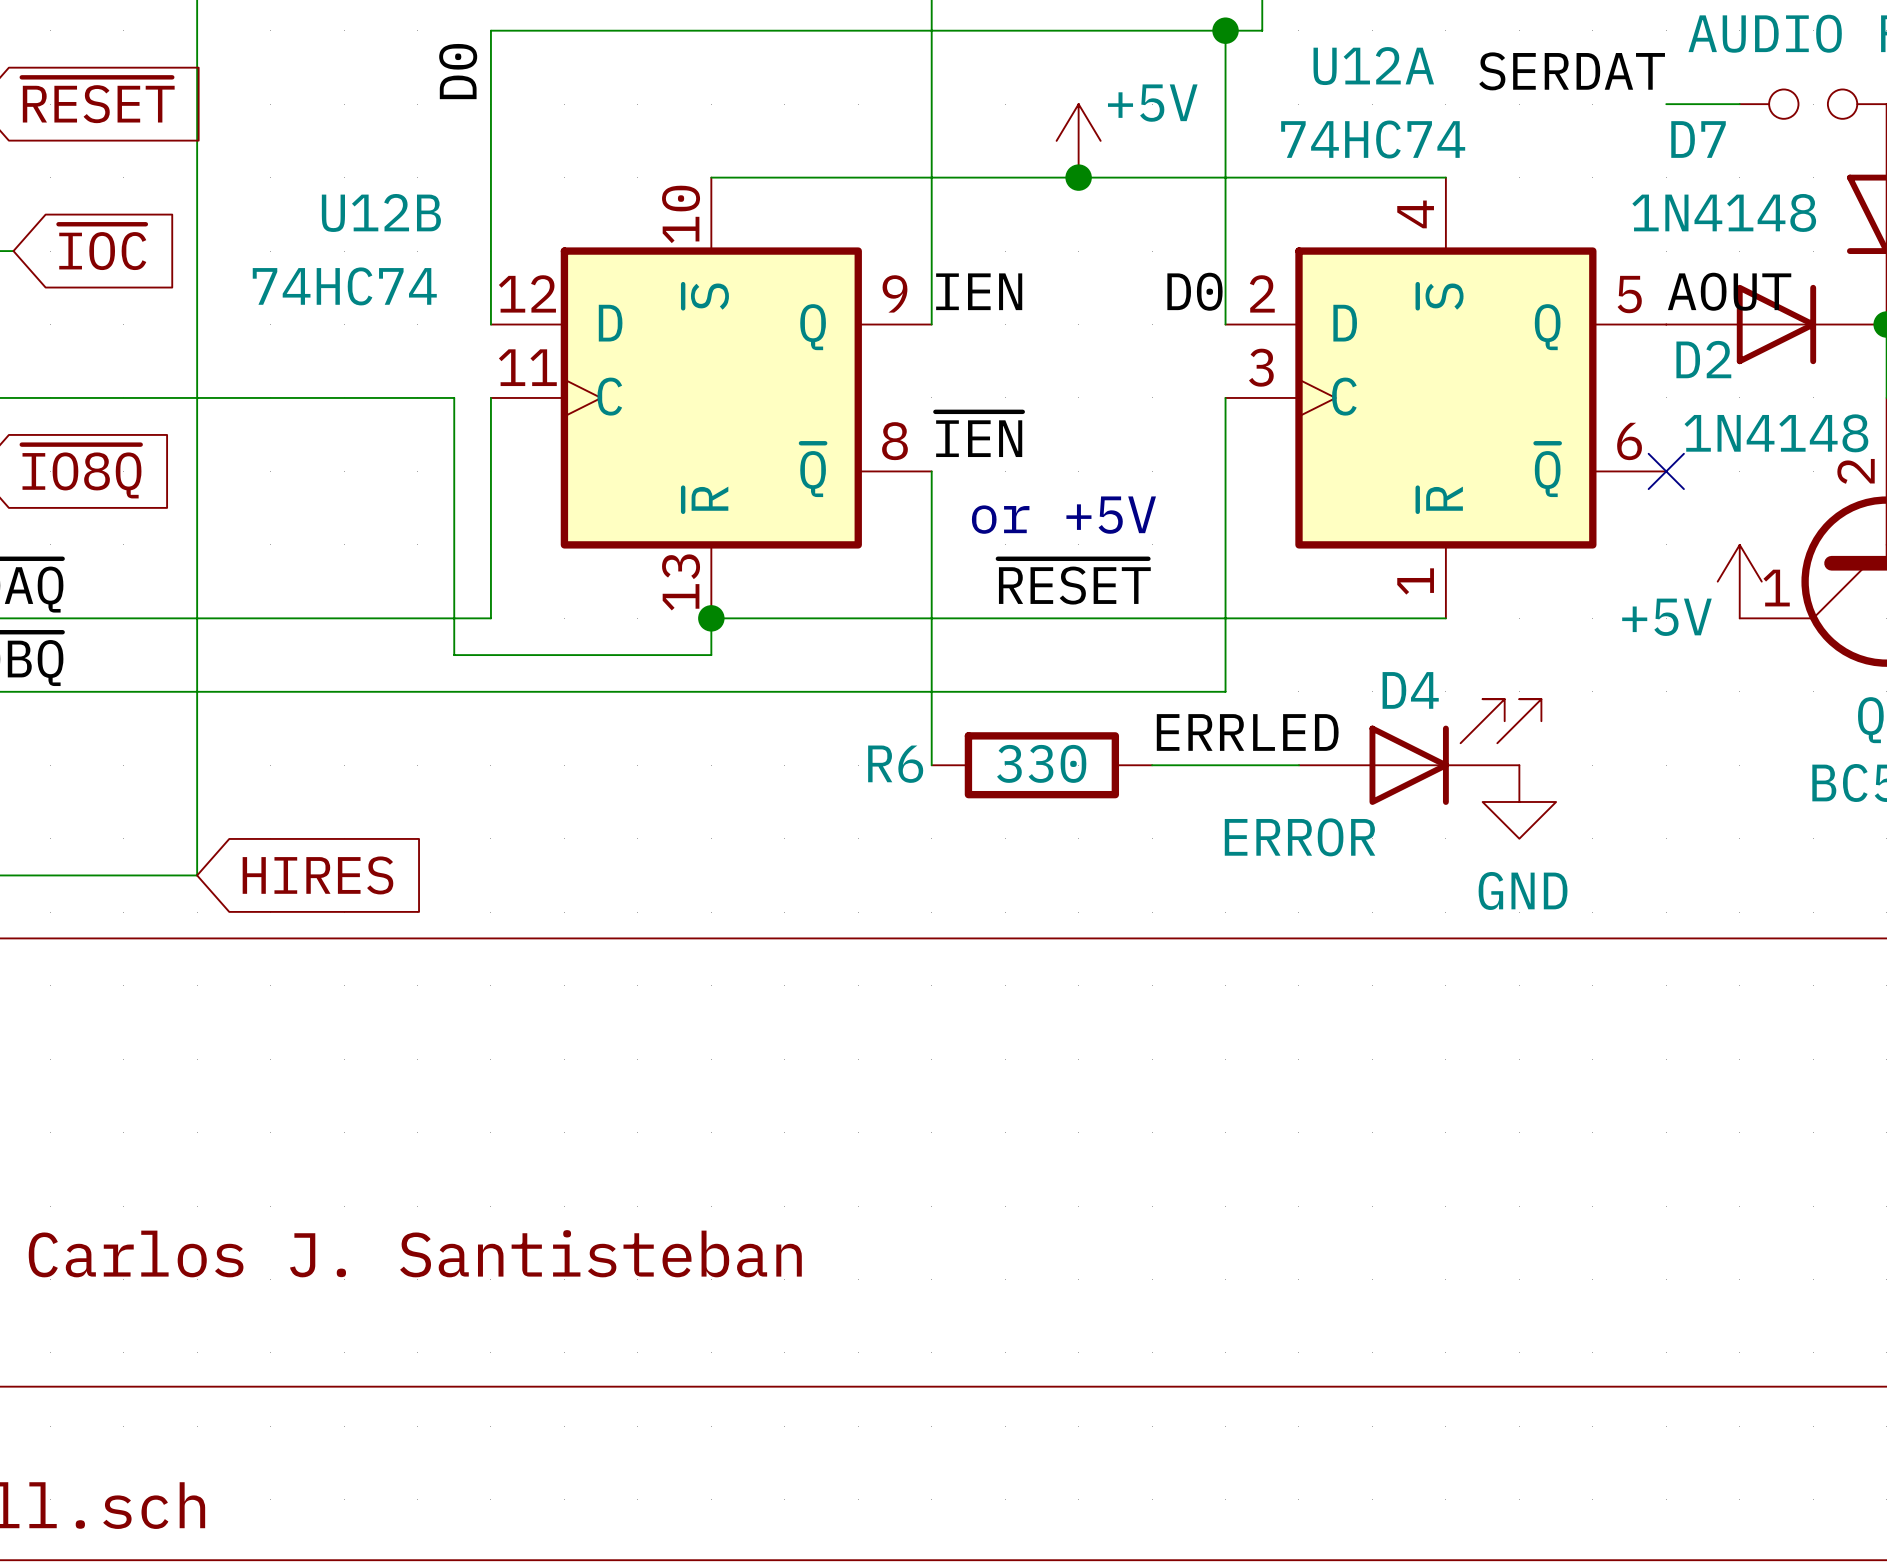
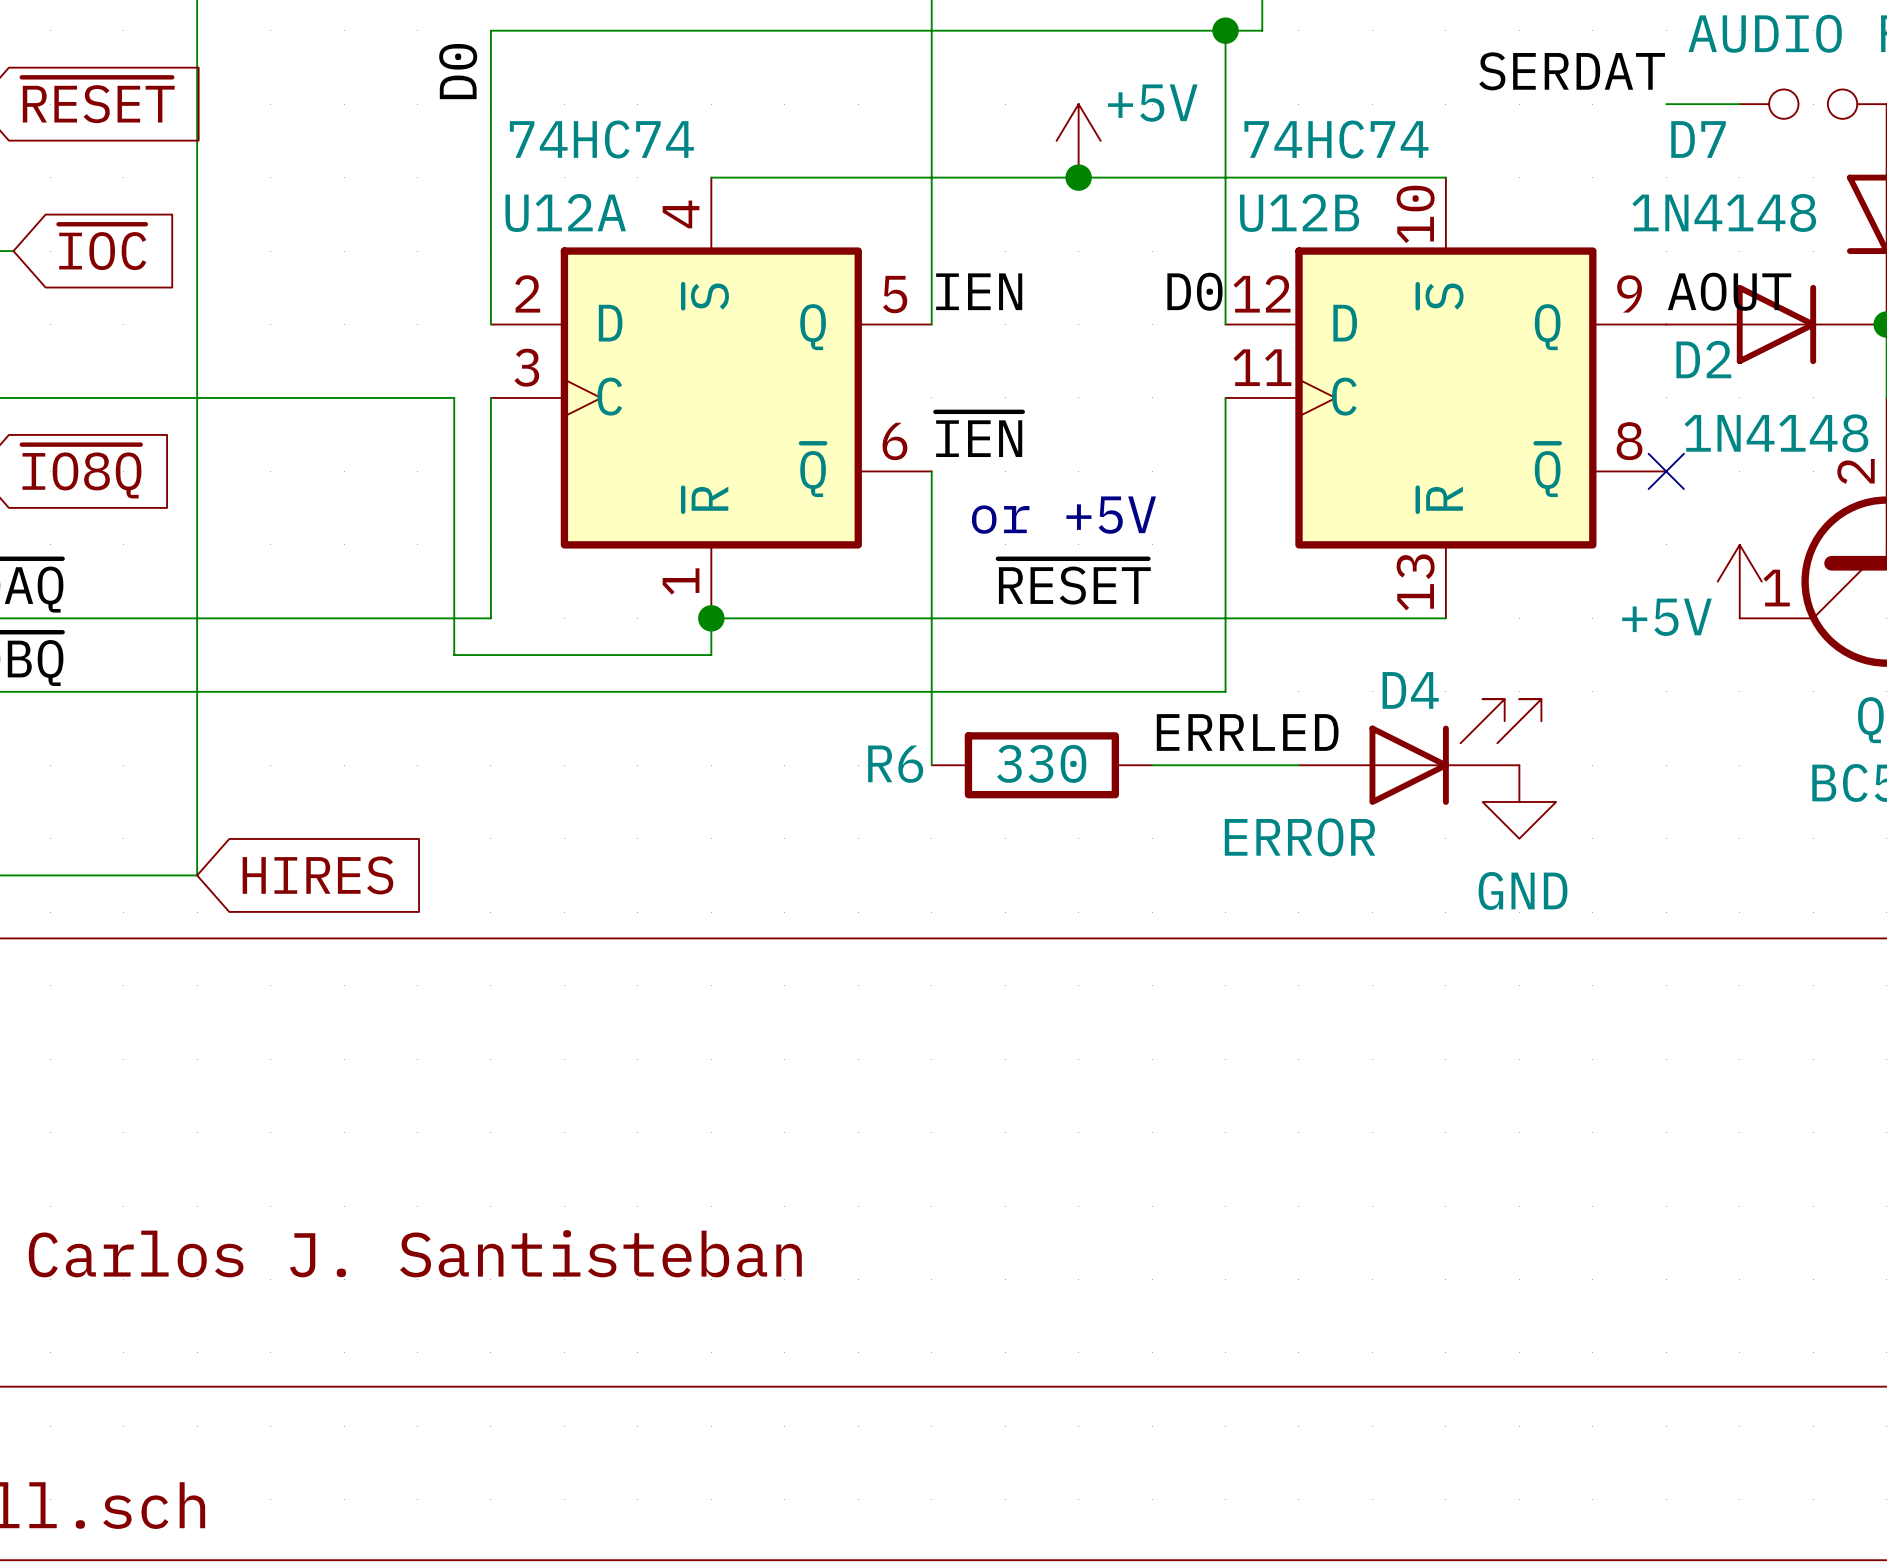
U12A name position: U12A (1373, 66) -> U12A (565, 212)
U12A value position: 74HC74 (1373, 139) -> 74HC74 (601, 139)
U12B name position: U12B (381, 212) -> U12B (1299, 212)
U12B value position: 74HC74 (344, 286) -> 74HC74 (1336, 139)
U12B position: (711, 397) -> (1445, 397)
U12A position: (1445, 397) -> (711, 397)

